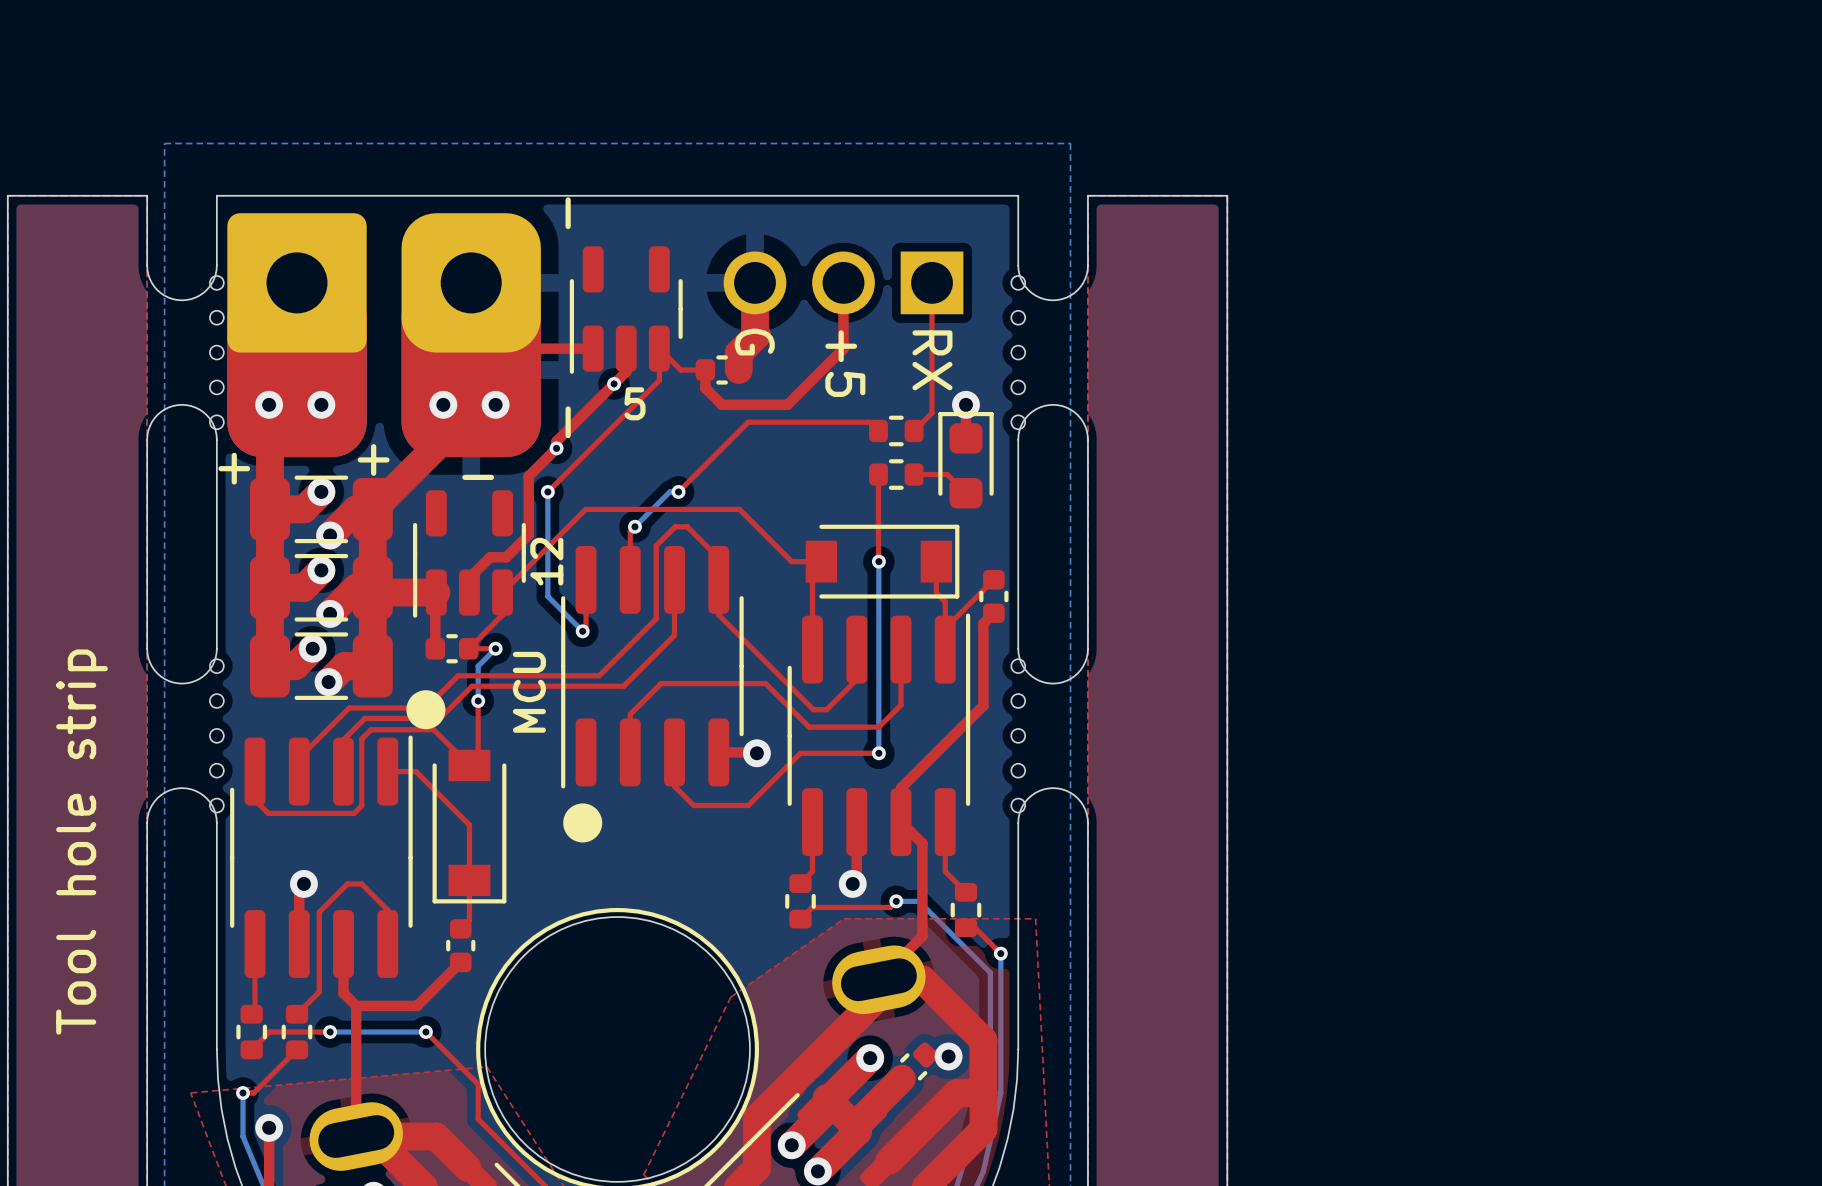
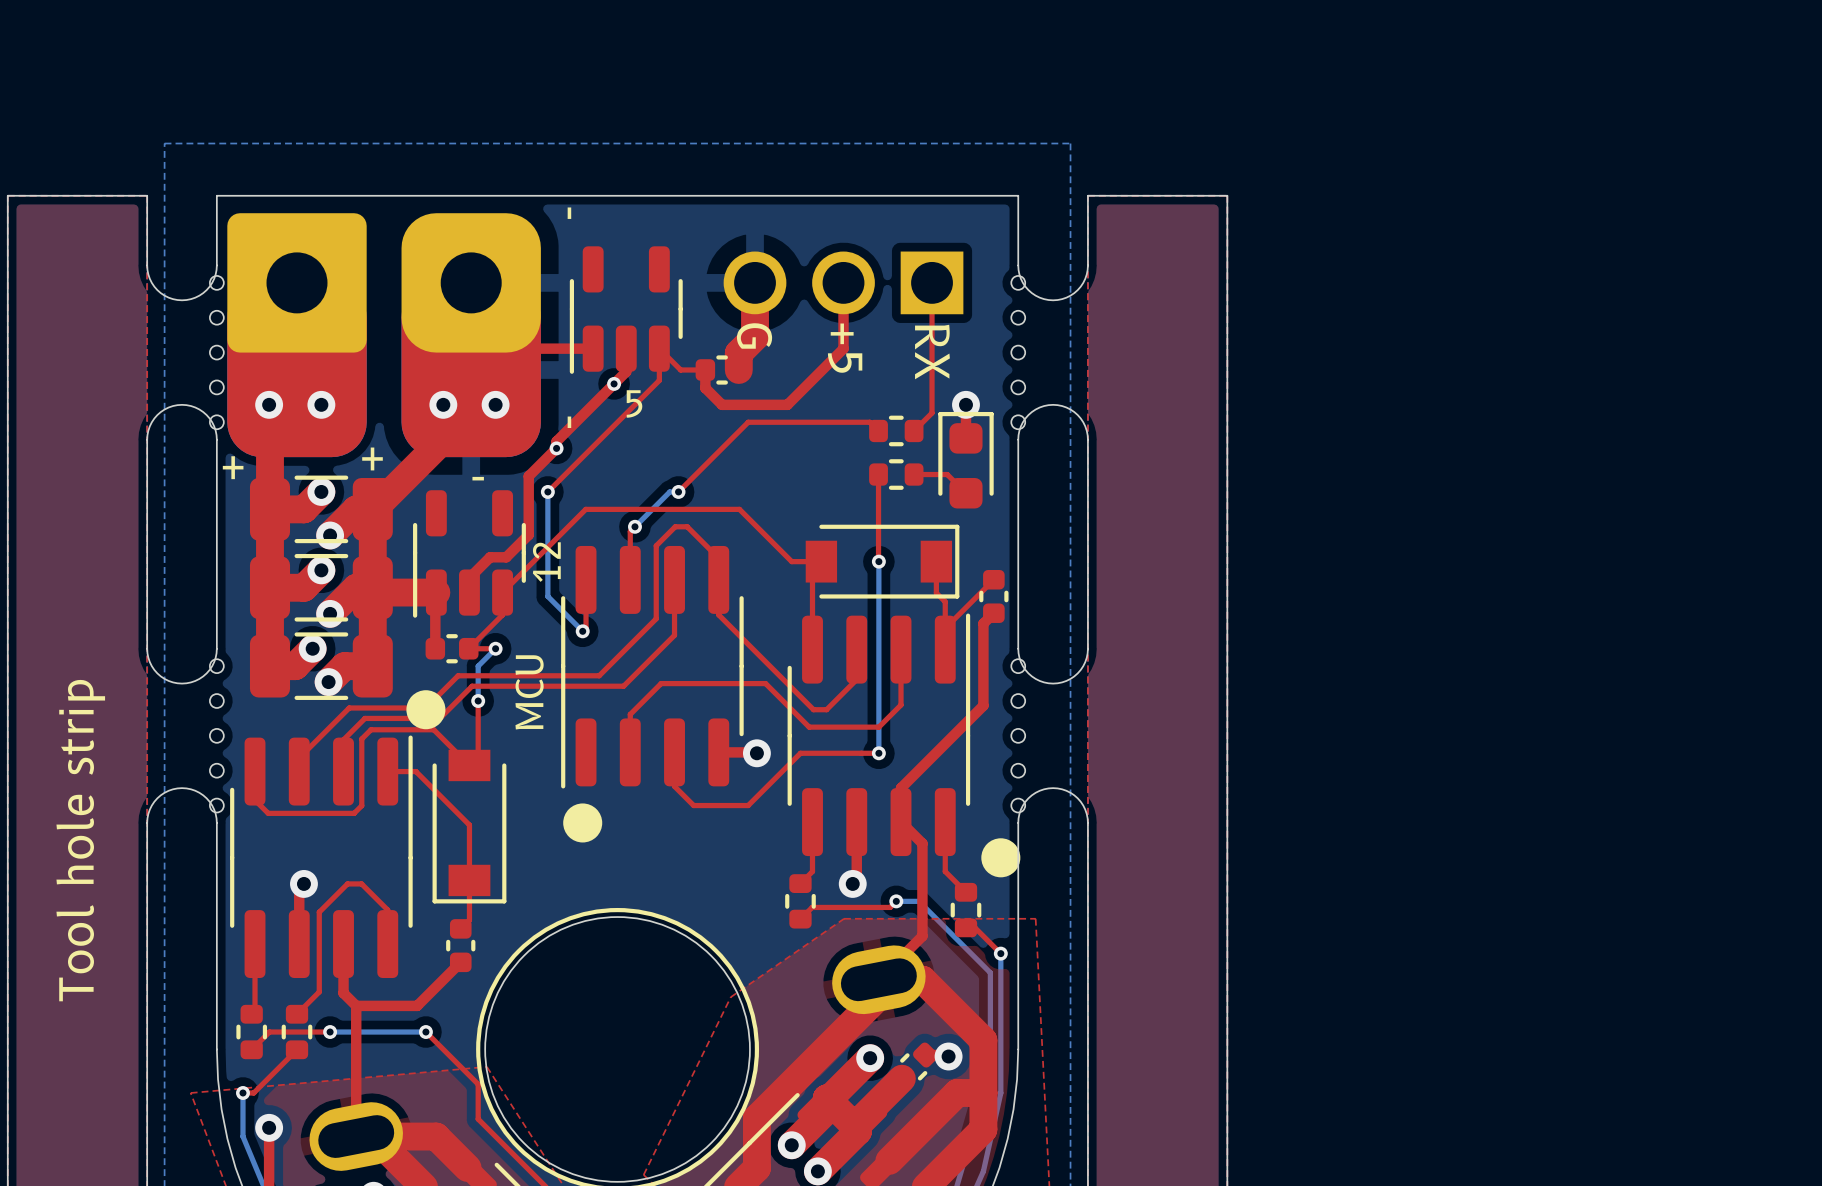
drawing: none -> [981, 838, 1021, 878]

